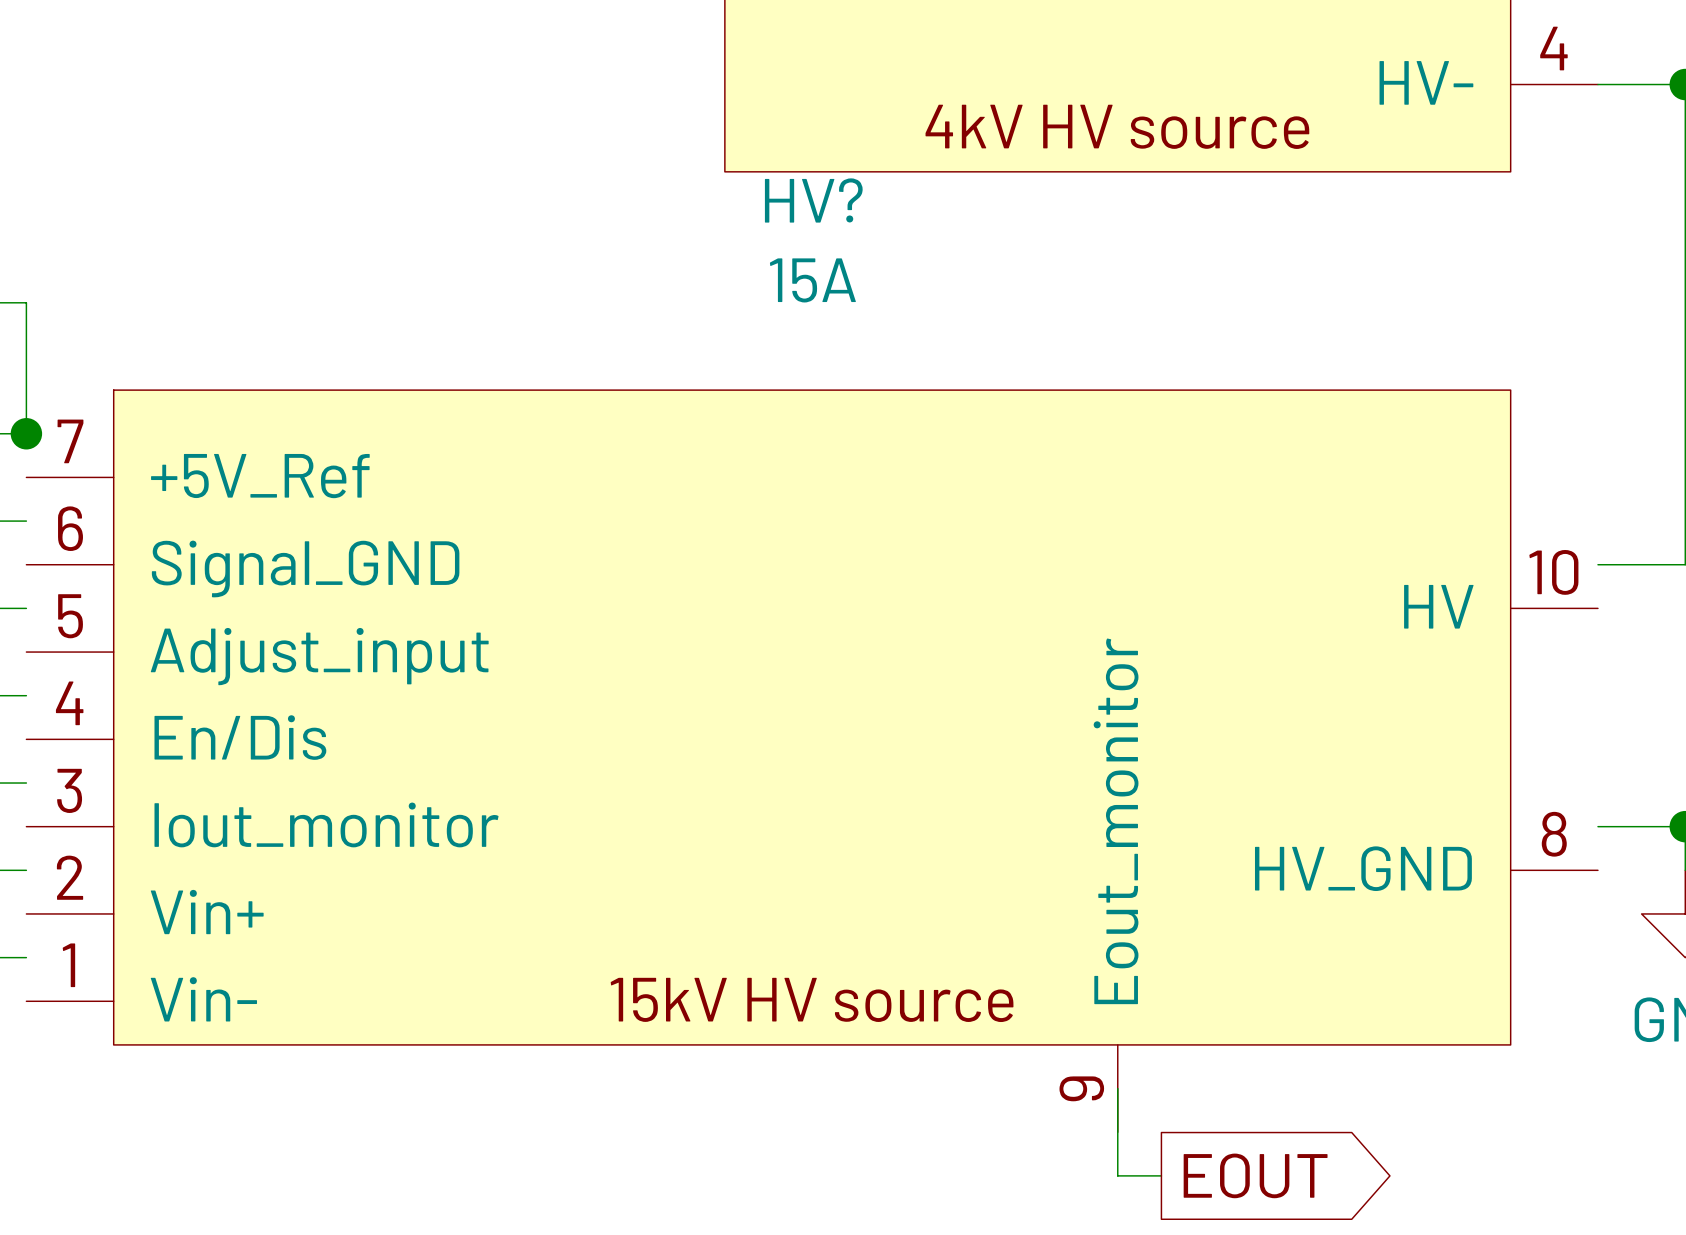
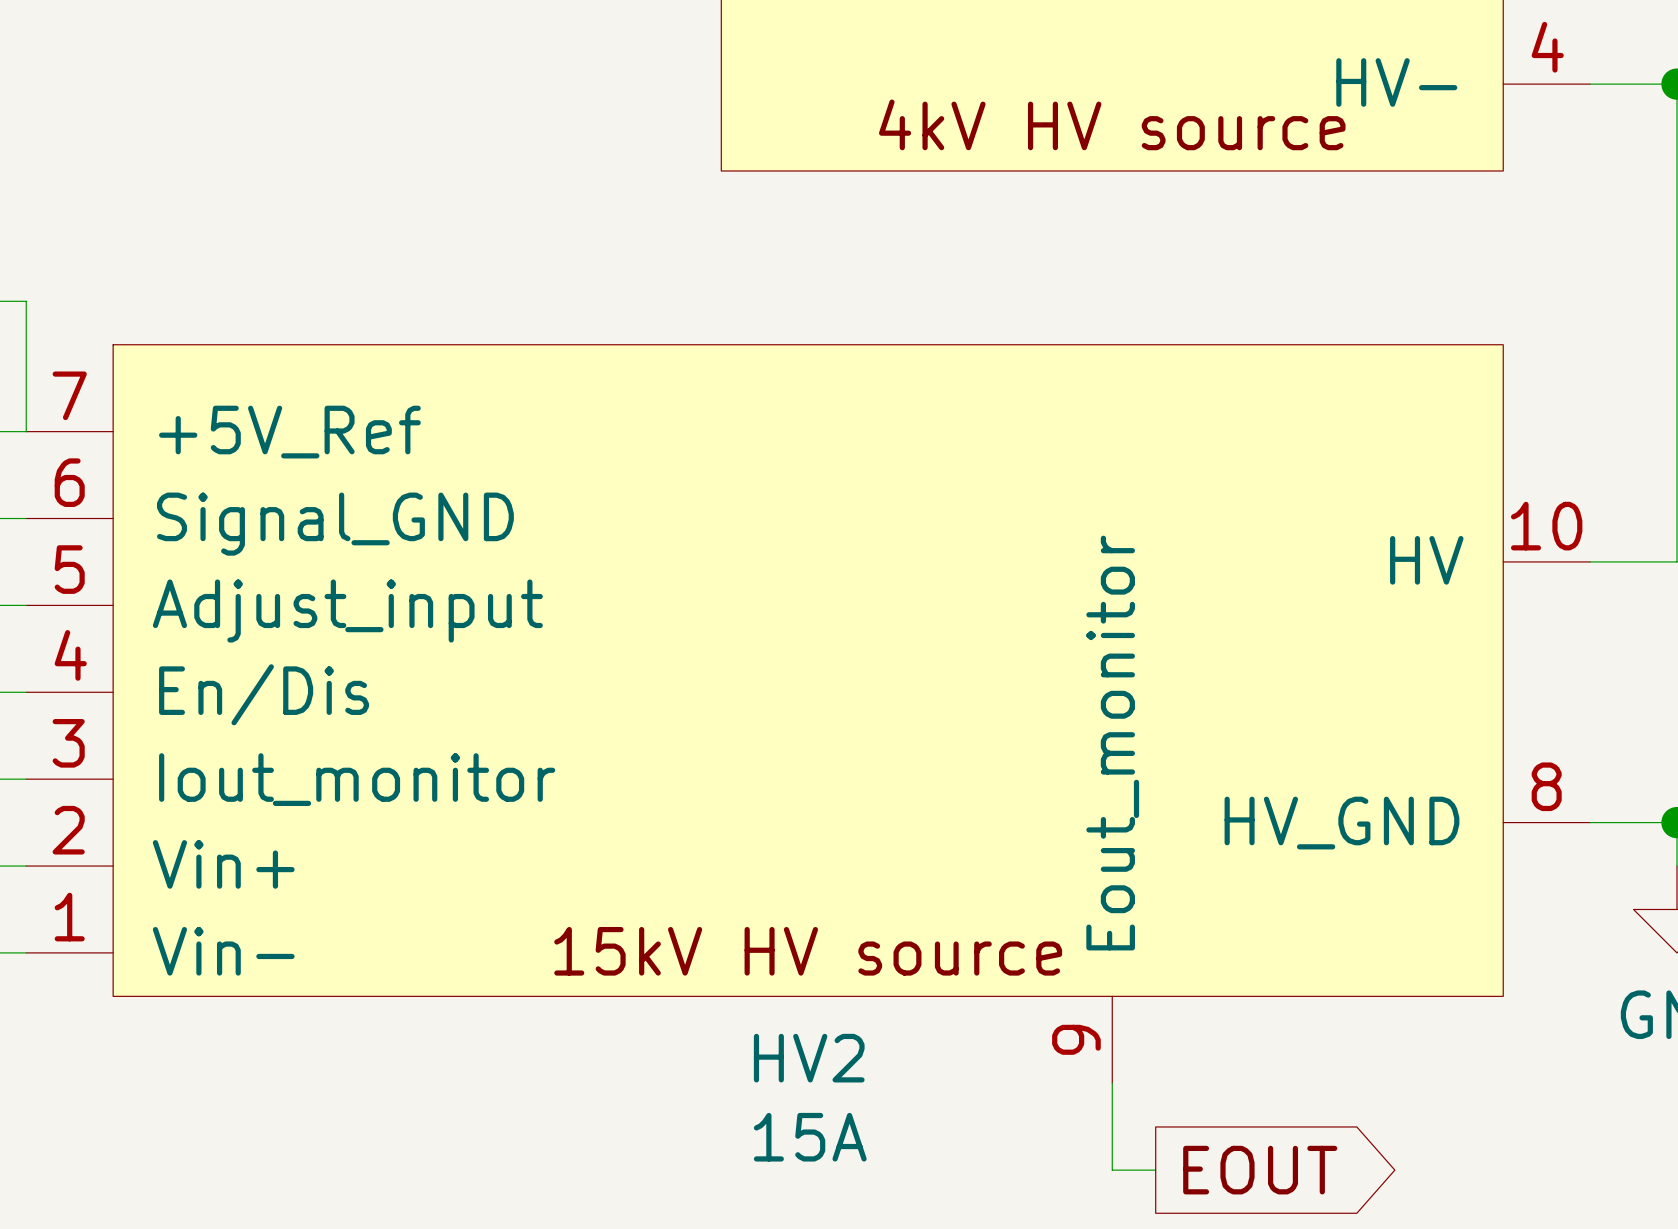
junction: (26, 433) -> none
HV2: none -> 15A (808, 713)
HV?: 15A (812, 761) -> none

